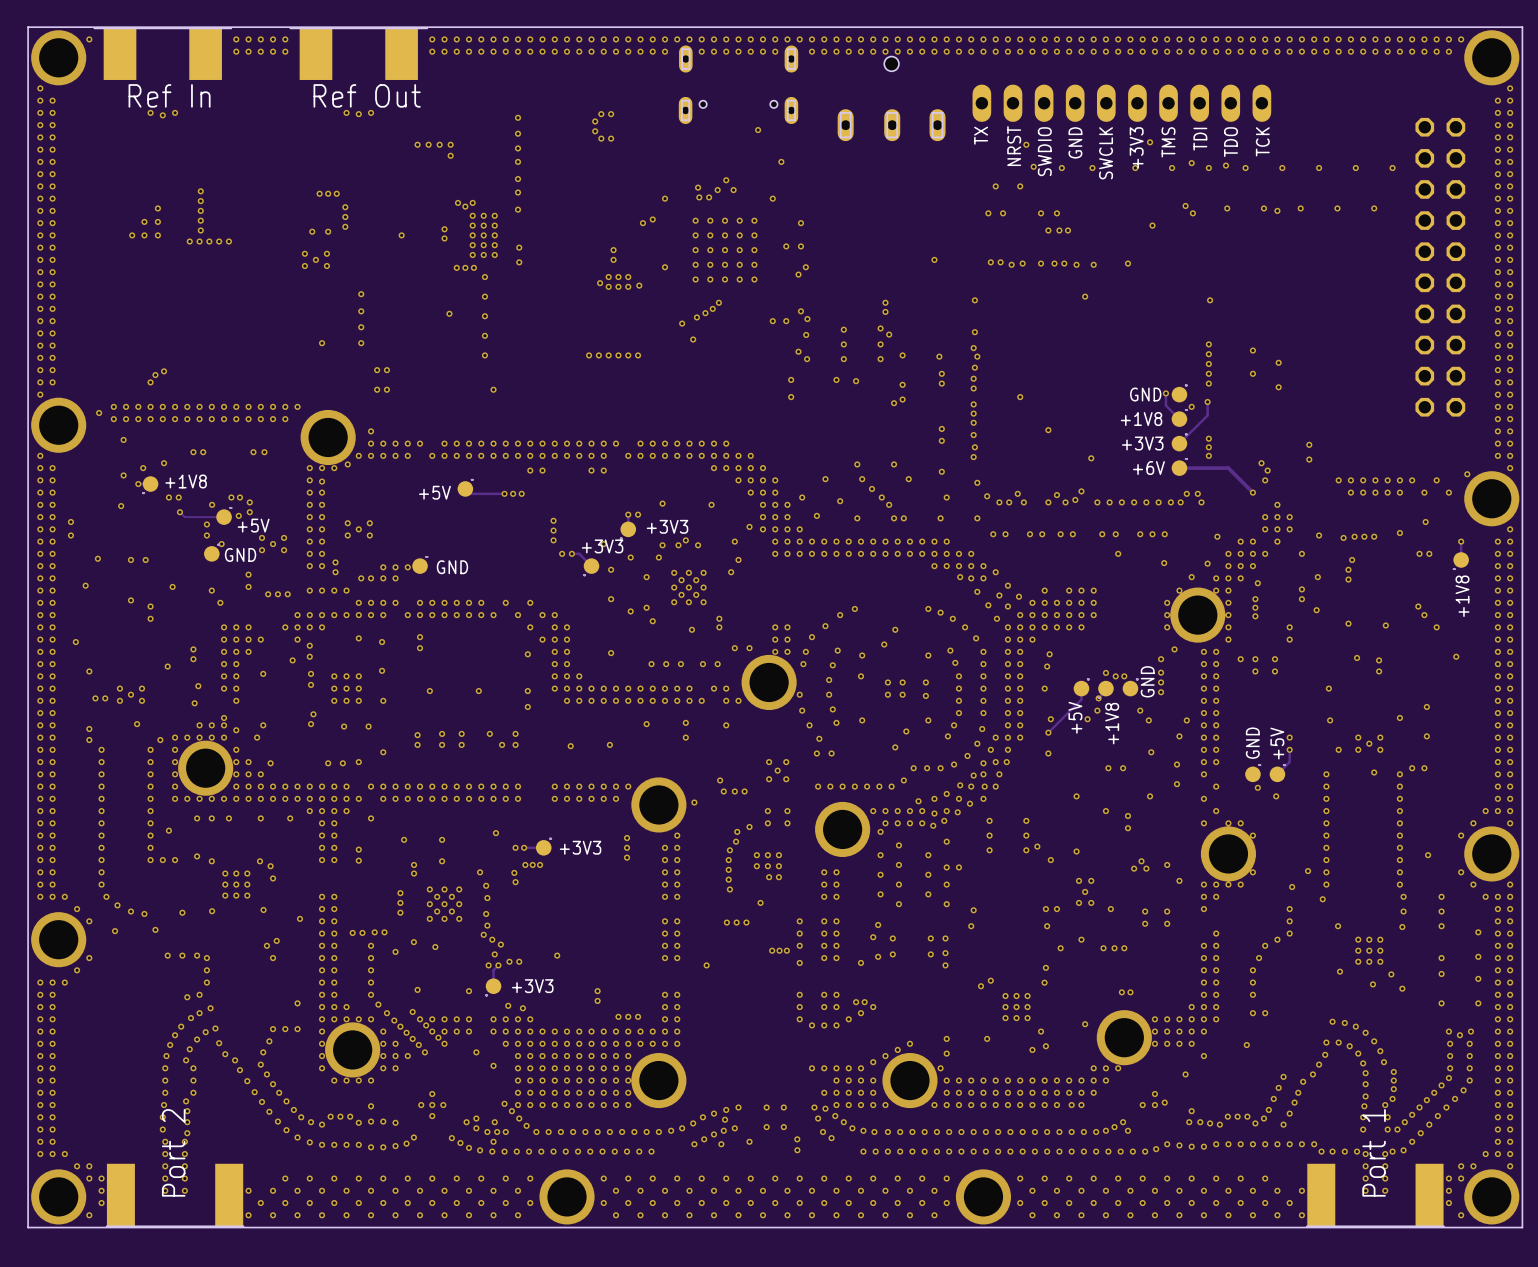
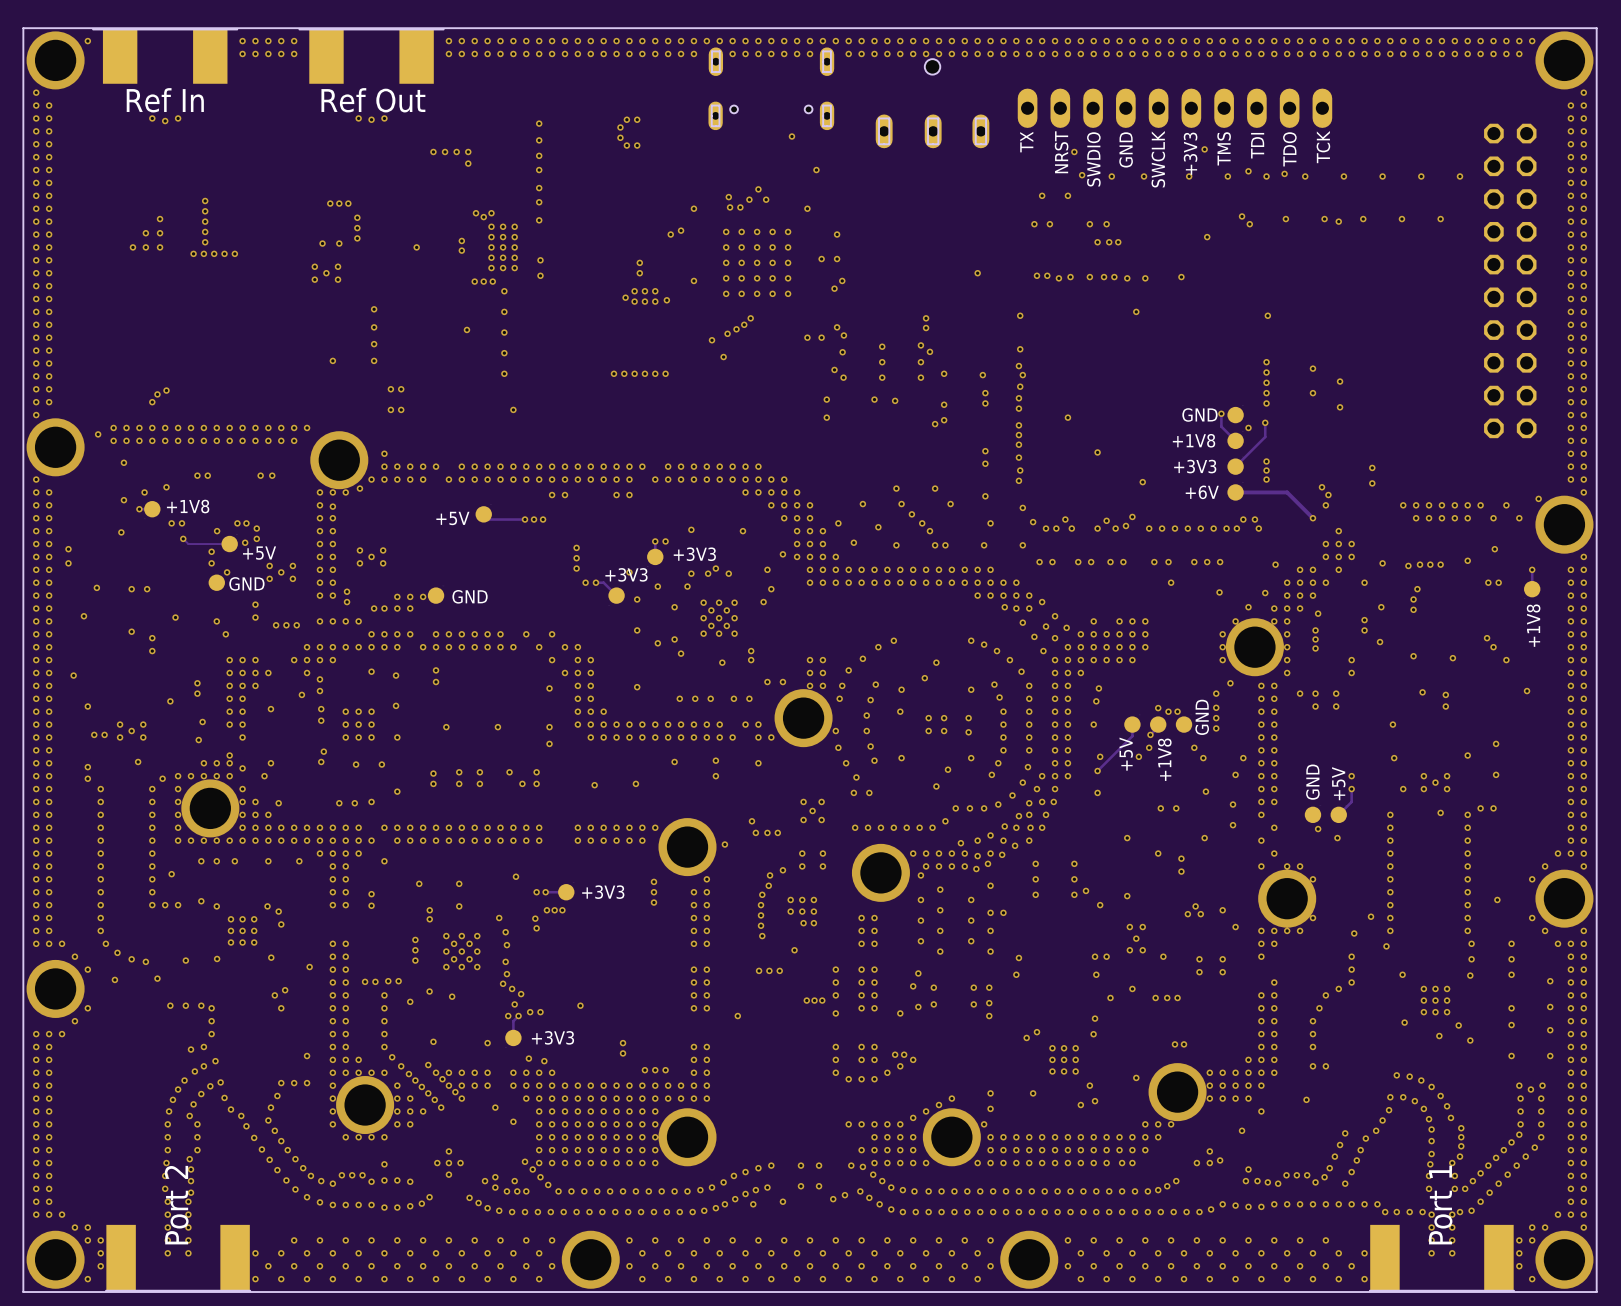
via: (818, 1118) -> none
via: (725, 1119) -> none
via: (1128, 1130) -> none
via: none -> (844, 1195)
via: (493, 1141) -> none
via: none -> (879, 1204)
via: none -> (715, 1208)
via: none -> (891, 1209)
via: none -> (704, 1210)
via: (797, 1150) -> none
via: none -> (692, 1212)

